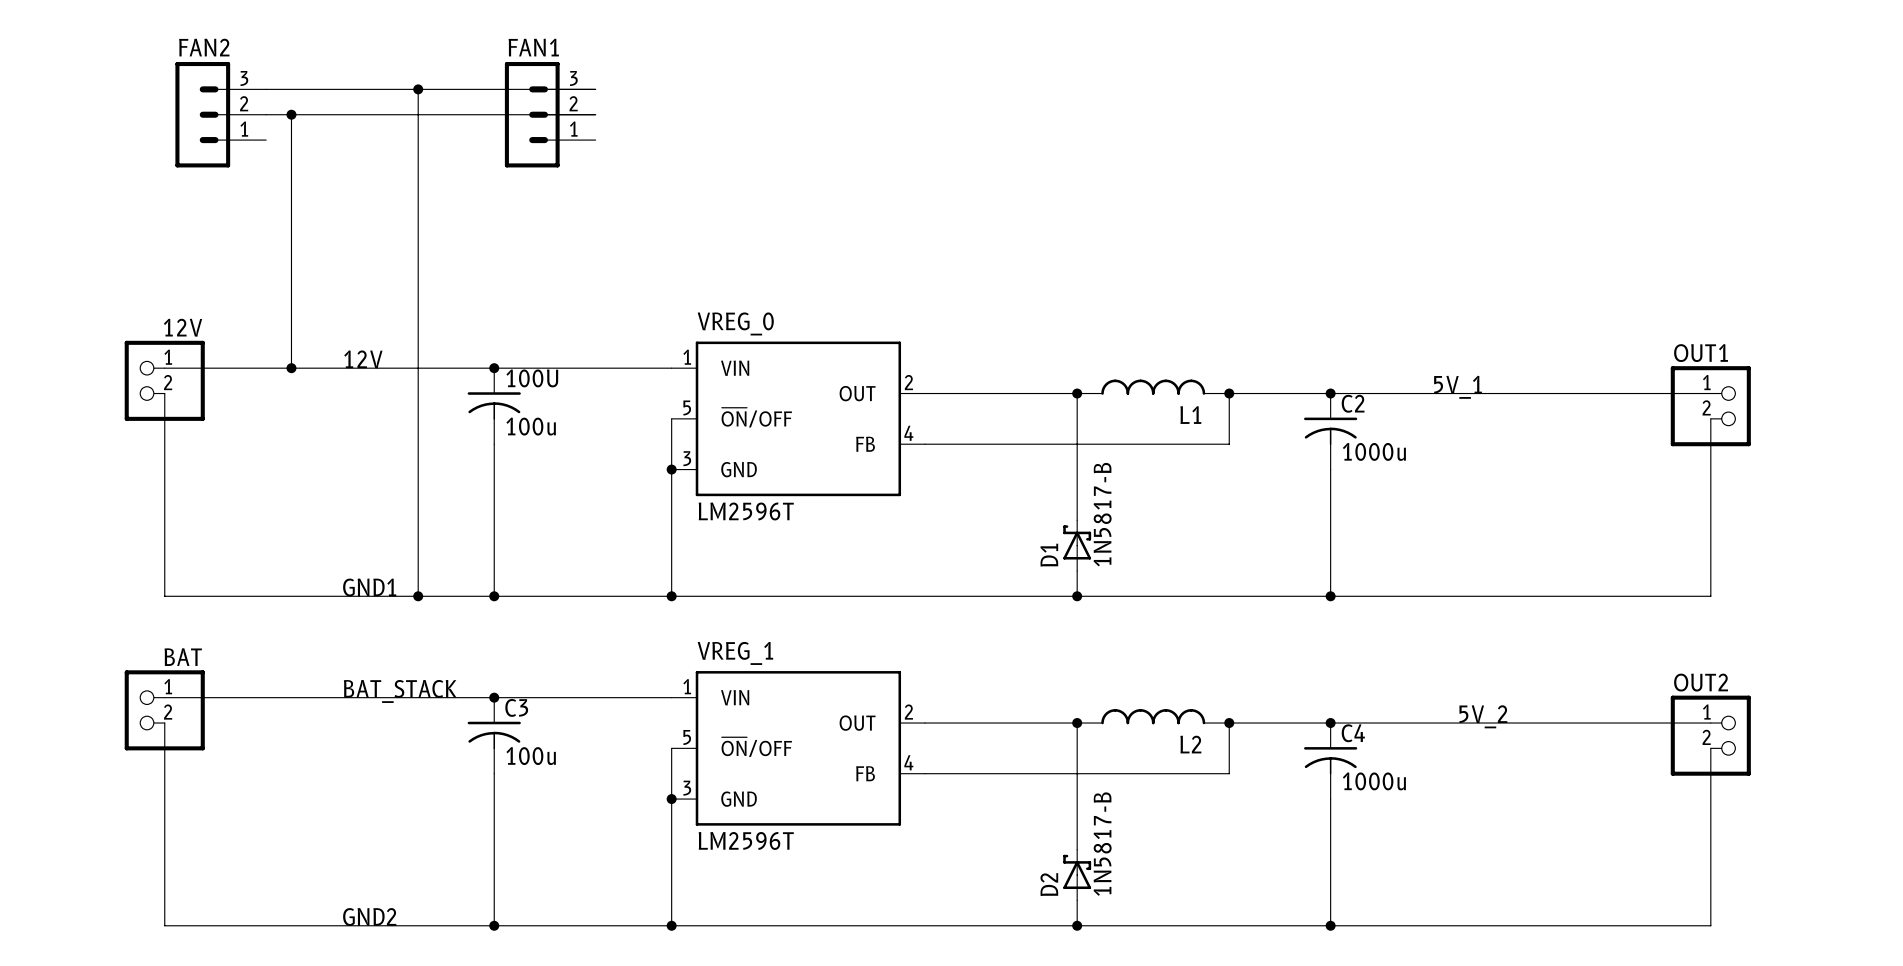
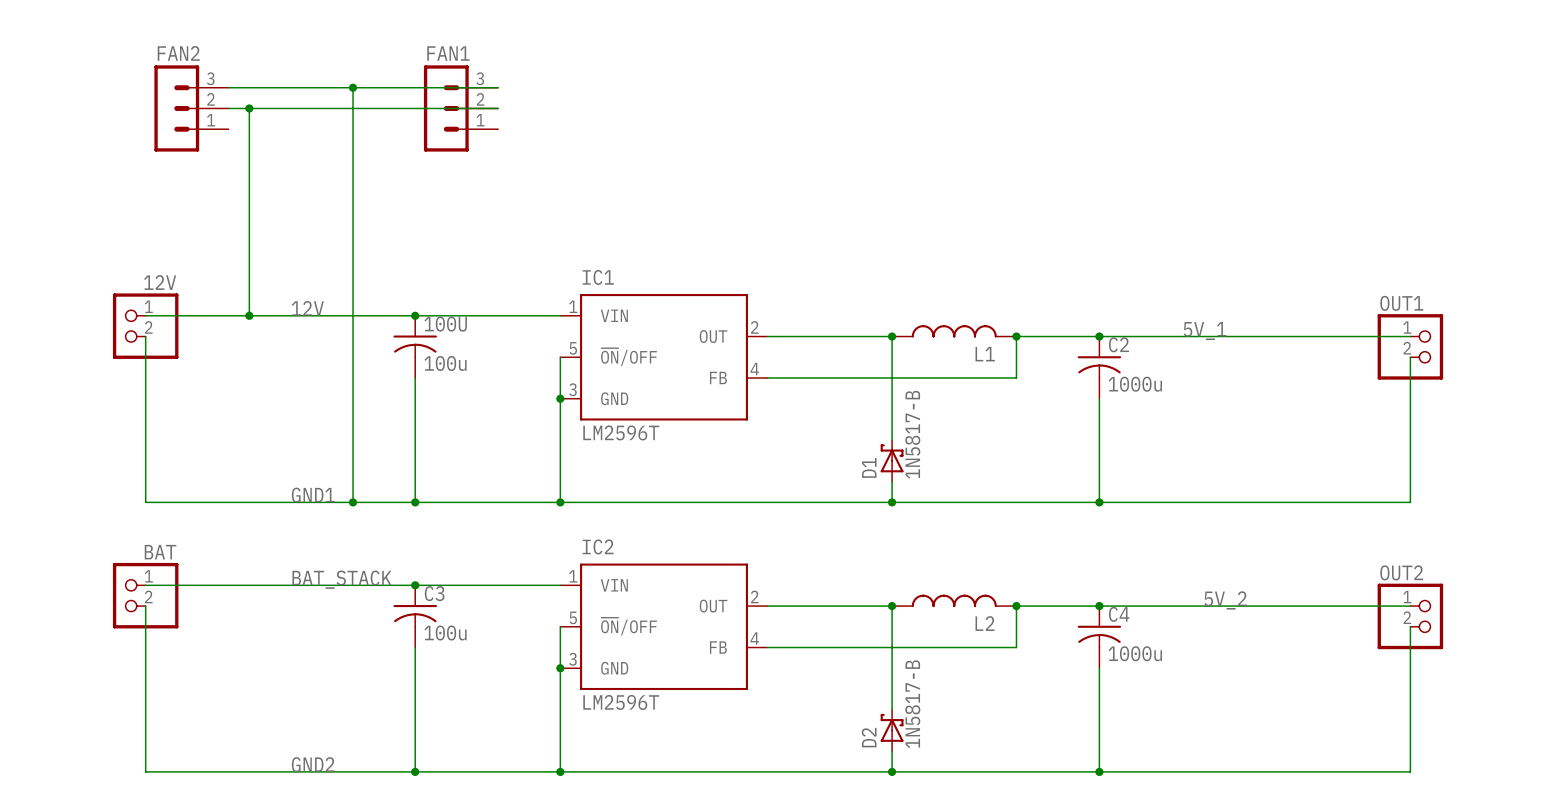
VREG_0 name: VREG_0 (735, 323) -> IC1 (598, 277)
VREG_1 name: VREG_1 (735, 653) -> IC2 (598, 546)

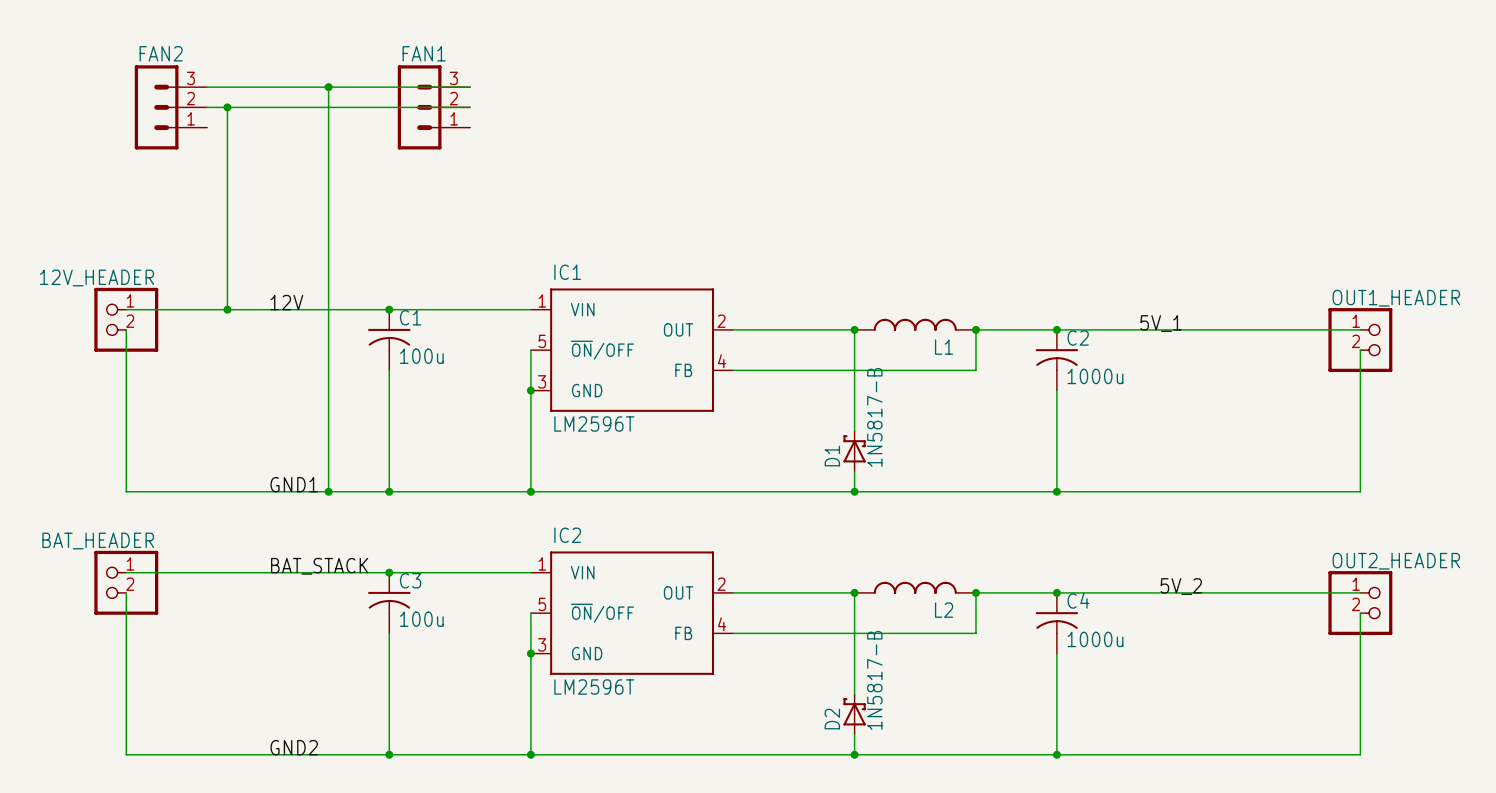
12V name: 12V (160, 282) -> 12V_HEADER (97, 277)
OUT1 name: OUT1 (1401, 303) -> OUT1_HEADER (1396, 298)
100U name: 100U (445, 324) -> C1 (410, 317)
BAT name: BAT (160, 552) -> BAT_HEADER (98, 540)
OUT2 name: OUT2 (1401, 572) -> OUT2_HEADER (1396, 561)

